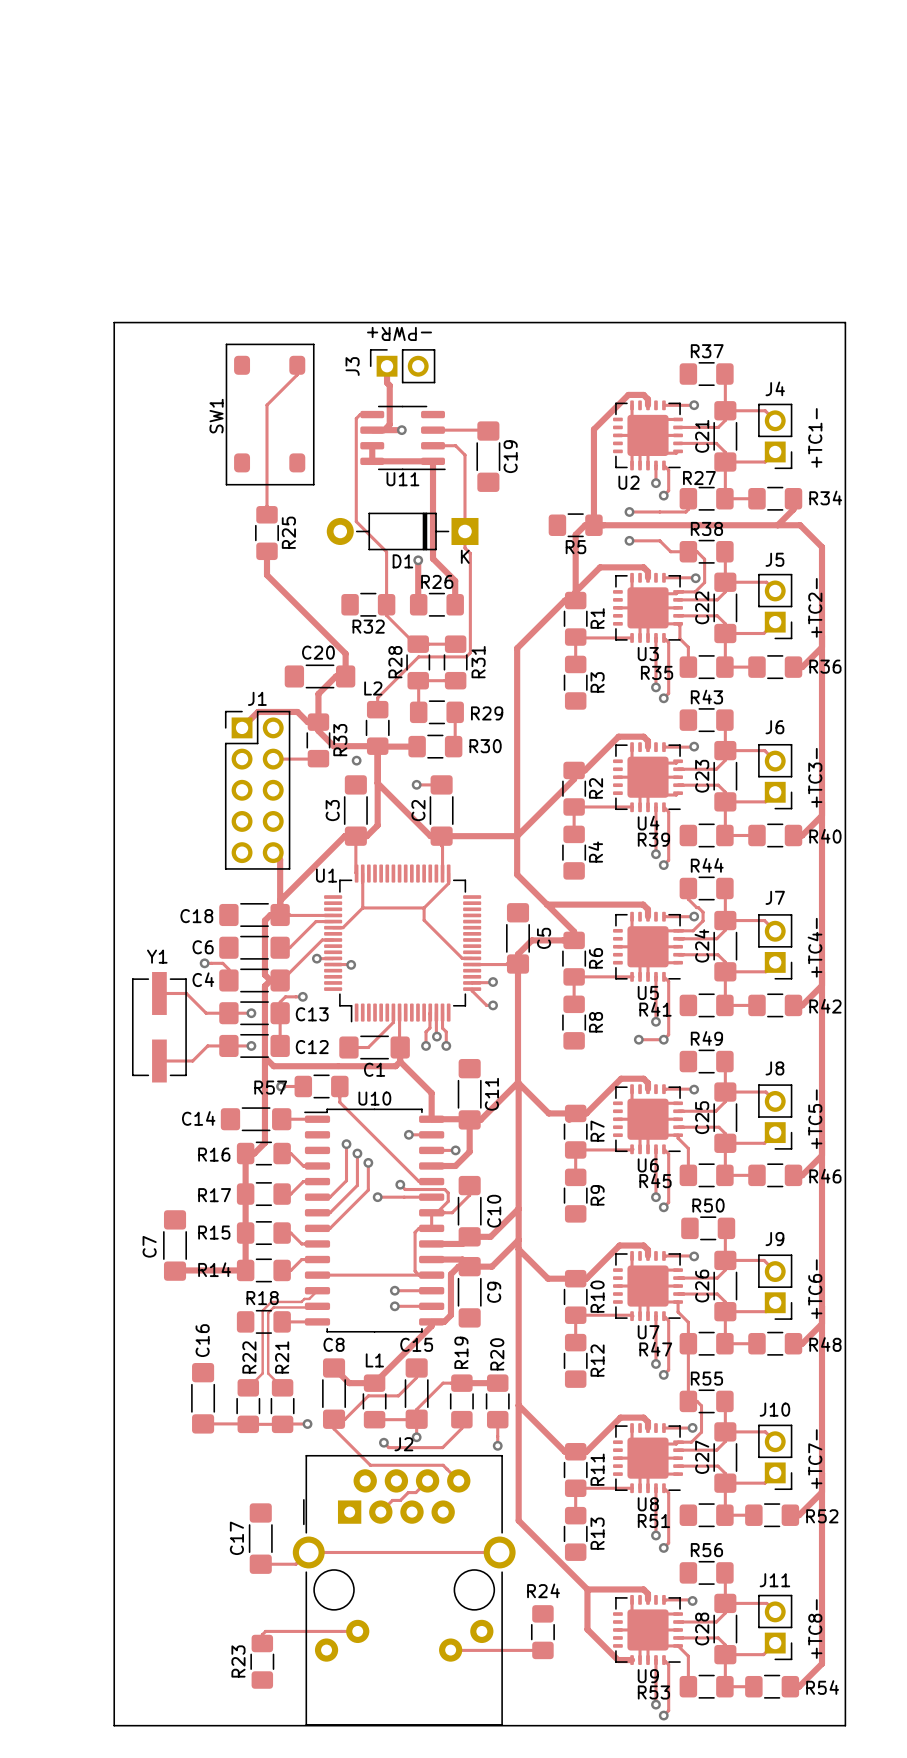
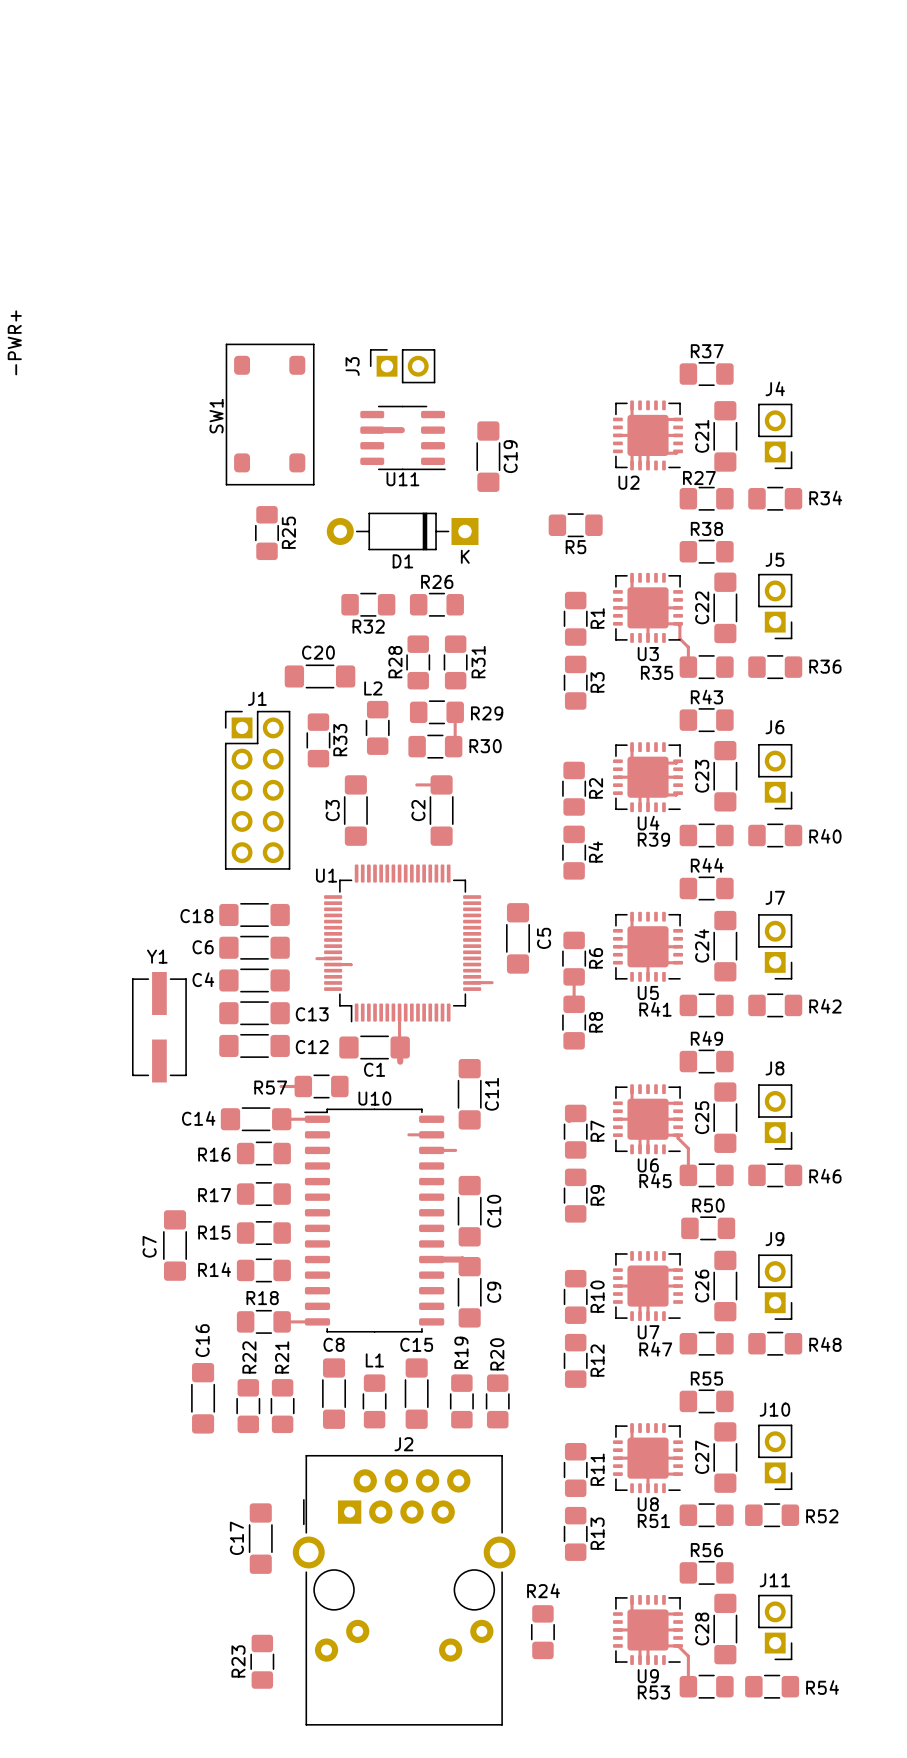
board edge: (114, 322) (114, 1725) (845, 1725) (845, 322) (114, 322) -> none
text: -PWR+ (399, 333) -> none
text: none -> -PWR+ (14, 342)
track: (297, 365) (297, 374) (267, 405) (267, 514) -> none
track: (387, 366) (387, 382) (389, 385) (389, 424) (384, 430) -> none
track: (724, 374) (725, 420) (718, 427) (679, 427) -> none
track: (648, 405) (648, 399) (643, 394) (628, 394) (593, 429) (593, 525) -> none
track: (663, 405) (694, 405) -> none
via: (694, 405) -> none
track: (725, 410) (765, 410) (775, 420) -> none
track: (372, 414) (360, 414) (356, 418) (356, 521) (386, 551) (386, 615) (415, 644) (455, 644) -> none
via: (401, 430) -> none
track: (433, 430) (488, 431) -> none
text: +TC1- (815, 437) -> none
track: (679, 443) (716, 443) (725, 452) (724, 498) (756, 498) -> none
track: (372, 445) (372, 461) (433, 461) (433, 558) (455, 580) (455, 604) -> none
track: (433, 445) (455, 445) (464, 455) (464, 548) (470, 553) (470, 652) (466, 656) (418, 656) (377, 697) (377, 709) -> none
track: (775, 451) (765, 462) (725, 462) -> none
track: (655, 465) (655, 483) -> none
track: (663, 465) (668, 470) (668, 490) (663, 495) -> none
via: (655, 483) -> none
via: (663, 495) -> none
track: (688, 498) (688, 509) (685, 511) (629, 511) -> none
track: (793, 498) (793, 509) (777, 525) -> none
via: (629, 511) -> none
track: (629, 540) (659, 540) (670, 551) (697, 551) (704, 559) (704, 582) (695, 591) (662, 593) (640, 615) (640, 637) -> none
via: (629, 540) -> none
track: (267, 551) (267, 575) (345, 653) (345, 676) (335, 676) (318, 693) (318, 730) (333, 746) (377, 746) -> none
track: (724, 551) (725, 591) (717, 599) (678, 599) -> none
track: (418, 560) (418, 604) -> none
via: (418, 560) -> none
track: (648, 577) (648, 571) (643, 567) (600, 567) (575, 591) -> none
track: (663, 577) (695, 578) -> none
via: (695, 578) -> none
track: (725, 582) (766, 582) (775, 590) -> none
text: +TC2- (815, 607) -> none
track: (678, 615) (717, 615) (725, 623) (724, 667) (756, 667) -> none
track: (775, 622) (763, 633) (725, 633) -> none
track: (632, 637) (575, 637) (575, 664) -> none
track: (655, 637) (655, 687) -> none
track: (663, 637) (668, 642) (668, 693) (663, 698) -> none
track: (822, 647) (802, 667) (793, 667) -> none
track: (455, 680) (418, 680) (418, 712) -> none
via: (655, 687) -> none
via: (663, 698) -> none
track: (724, 720) (725, 760) (716, 769) (678, 769) -> none
track: (318, 722) (307, 722) (297, 711) (258, 711) (242, 727) -> none
track: (377, 746) (417, 746) -> none
track: (377, 746) (377, 825) (366, 836) (344, 836) (280, 900) -> none
track: (694, 746) (663, 747) -> none
via: (694, 746) -> none
track: (648, 747) (648, 741) (643, 736) (618, 736) (584, 770) (574, 770) (574, 779) (517, 836) (430, 836) (377, 783) -> none
track: (725, 750) (764, 750) (775, 761) -> none
track: (318, 758) (273, 759) -> none
via: (356, 760) -> none
text: +TC3- (815, 777) -> none
via: (416, 784) -> none
track: (678, 785) (718, 785) (725, 792) (724, 835) (756, 835) -> none
track: (775, 792) (765, 801) (725, 801) -> none
track: (632, 807) (574, 806) (574, 834) -> none
track: (655, 807) (655, 854) -> none
track: (663, 807) (668, 812) (668, 860) (663, 865) -> none
track: (822, 815) (802, 835) (793, 835) -> none
track: (355, 836) (356, 873) -> none
track: (441, 836) (442, 873) -> none
track: (273, 852) (280, 859) (280, 914) -> none
via: (655, 854) -> none
via: (663, 865) -> none
track: (362, 873) (362, 907) -> none
track: (448, 873) (448, 883) (424, 907) -> none
track: (688, 888) (688, 899) (703, 912) (703, 920) (693, 930) (663, 930) (640, 954) (640, 976) -> none
track: (724, 888) (725, 930) (716, 938) (678, 938) -> none
track: (547, 904) (643, 904) (648, 909) (648, 916) -> none
track: (362, 907) (342, 927) (333, 927) -> none
track: (362, 907) (424, 907) -> none
track: (424, 907) (424, 920) (462, 958) (472, 958) -> none
track: (280, 914) (333, 915) -> none
track: (280, 914) (270, 914) (264, 920) (264, 974) (270, 980) -> none
track: (663, 916) (694, 916) -> none
via: (694, 916) -> none
track: (725, 920) (764, 920) (775, 931) -> none
track: (333, 921) (315, 921) (289, 947) (280, 947) -> none
track: (333, 939) (322, 939) (281, 980) -> none
text: +TC4- (815, 947) -> none
track: (678, 954) (717, 954) (725, 962) (724, 1005) (756, 1005) -> none
via: (316, 958) -> none
track: (775, 962) (765, 971) (725, 971) -> none
track: (204, 963) (222, 963) (228, 969) (228, 980) -> none
via: (204, 963) -> none
via: (351, 964) -> none
track: (518, 964) (472, 964) -> none
track: (574, 976) (632, 976) -> none
track: (655, 976) (655, 1021) -> none
track: (663, 976) (668, 981) (668, 1034) (663, 1039) (638, 1039) -> none
track: (270, 980) (264, 986) (264, 1142) (254, 1153) (245, 1153) (245, 1270) (175, 1271) -> none
via: (493, 982) -> none
track: (822, 985) (802, 1005) (793, 1005) -> none
track: (472, 989) (486, 1005) (493, 1005) -> none
track: (159, 993) (186, 993) (206, 1013) (251, 1013) -> none
track: (302, 996) (285, 996) (280, 1002) (280, 1045) -> none
via: (302, 996) -> none
via: (493, 1005) -> none
track: (393, 1012) (393, 1022) (368, 1047) (348, 1047) -> none
track: (430, 1012) (429, 1027) (426, 1031) (426, 1045) -> none
track: (436, 1012) (436, 1036) -> none
track: (442, 1012) (442, 1028) (446, 1031) (446, 1045) -> none
via: (251, 1013) -> none
via: (655, 1021) -> none
via: (436, 1036) -> none
via: (638, 1039) -> none
via: (663, 1039) -> none
track: (251, 1045) (207, 1045) (192, 1061) (159, 1061) -> none
via: (251, 1045) -> none
via: (426, 1045) -> none
via: (446, 1045) -> none
track: (264, 1057) (273, 1066) (337, 1066) -> none
track: (724, 1061) (725, 1101) (715, 1111) (678, 1111) -> none
track: (338, 1066) (395, 1066) (400, 1061) (431, 1093) (431, 1119) (469, 1119) -> none
track: (518, 1082) (518, 954) (531, 940) (574, 940) (574, 931) (517, 874) (517, 648) (564, 600) (575, 600) (575, 534) (585, 525) (800, 525) (822, 547) (822, 1663) (799, 1686) (790, 1686) -> none
track: (518, 1082) (480, 1119) (469, 1119) -> none
track: (518, 1082) (548, 1113) (586, 1113) (621, 1078) (643, 1078) (648, 1083) (648, 1089) -> none
track: (518, 1083) (518, 1520) (587, 1589) -> none
via: (281, 1086) -> none
track: (339, 1086) (339, 1102) (419, 1181) (431, 1181) -> none
track: (663, 1089) (694, 1089) -> none
via: (694, 1089) -> none
track: (725, 1092) (765, 1092) (775, 1101) -> none
track: (469, 1119) (469, 1151) (455, 1166) (431, 1166) -> none
text: +TC5- (815, 1119) -> none
track: (678, 1127) (718, 1127) (725, 1133) (724, 1175) (756, 1175) -> none
track: (775, 1132) (764, 1143) (725, 1143) -> none
via: (408, 1134) -> none
track: (346, 1144) (346, 1180) (330, 1197) (317, 1197) -> none
via: (346, 1144) -> none
track: (632, 1149) (575, 1149) (575, 1177) -> none
track: (655, 1149) (655, 1197) -> none
track: (663, 1149) (668, 1154) (668, 1202) (663, 1207) -> none
via: (455, 1150) -> none
track: (282, 1153) (290, 1153) (303, 1166) (317, 1166) -> none
track: (357, 1153) (357, 1185) (330, 1212) (317, 1212) -> none
via: (357, 1153) -> none
track: (822, 1155) (802, 1175) (793, 1175) -> none
track: (368, 1162) (368, 1190) (330, 1228) (317, 1228) -> none
via: (368, 1162) -> none
track: (317, 1181) (303, 1181) (290, 1194) (282, 1194) -> none
track: (400, 1184) (405, 1189) (444, 1189) (448, 1192) (448, 1201) (436, 1212) -> none
via: (400, 1184) -> none
track: (469, 1185) (469, 1195) (452, 1212) (431, 1212) (431, 1228) (419, 1228) (415, 1232) (415, 1271) (419, 1275) -> none
track: (377, 1197) (431, 1197) -> none
via: (377, 1197) -> none
via: (655, 1197) -> none
via: (663, 1207) -> none
track: (518, 1208) (490, 1236) (469, 1236) (462, 1243) (431, 1243) -> none
track: (726, 1228) (725, 1270) (717, 1278) (678, 1278) -> none
track: (282, 1233) (290, 1233) (301, 1243) (317, 1243) -> none
track: (518, 1239) (491, 1266) (458, 1266) (450, 1274) (450, 1315) (444, 1321) (431, 1321) (431, 1326) (374, 1383) (349, 1383) (334, 1367) -> none
track: (518, 1249) (548, 1278) (586, 1278) (619, 1245) (643, 1245) (648, 1249) (648, 1255) -> none
track: (632, 1255) (632, 1270) (663, 1302) (678, 1302) (678, 1312) (688, 1322) (688, 1401) (697, 1401) (701, 1405) (701, 1432) (691, 1442) (662, 1444) (640, 1466) (640, 1488) -> none
track: (663, 1255) (694, 1256) -> none
via: (694, 1256) -> none
track: (317, 1259) (301, 1259) (290, 1270) (282, 1270) -> none
track: (725, 1260) (764, 1260) (775, 1271) -> none
track: (317, 1275) (431, 1275) -> none
text: +TC6- (815, 1289) -> none
track: (317, 1290) (309, 1298) (304, 1298) (301, 1301) (271, 1301) (262, 1310) (262, 1373) (248, 1387) -> none
via: (394, 1290) -> none
track: (395, 1290) (431, 1290) -> none
track: (678, 1294) (717, 1294) (725, 1302) (724, 1343) (756, 1343) -> none
track: (775, 1302) (766, 1311) (725, 1311) -> none
track: (317, 1306) (273, 1307) (268, 1312) (268, 1373) (282, 1387) -> none
via: (394, 1306) -> none
track: (395, 1306) (431, 1306) -> none
track: (632, 1316) (575, 1315) (575, 1342) -> none
track: (655, 1316) (655, 1363) -> none
track: (663, 1316) (668, 1320) (668, 1369) (663, 1374) -> none
track: (822, 1323) (802, 1343) (793, 1343) -> none
via: (655, 1363) -> none
track: (416, 1367) (416, 1377) (398, 1395) (368, 1395) (345, 1419) (334, 1419) (334, 1428) (370, 1465) (443, 1465) (458, 1480) -> none
via: (663, 1374) -> none
track: (497, 1383) (443, 1383) (416, 1409) (416, 1437) -> none
track: (724, 1401) (725, 1441) (716, 1450) (678, 1450) -> none
track: (518, 1405) (564, 1451) (586, 1451) (620, 1417) (643, 1417) (648, 1422) (648, 1428) -> none
track: (416, 1419) (374, 1419) -> none
track: (461, 1419) (461, 1428) (442, 1447) (388, 1447) (383, 1442) -> none
track: (497, 1419) (497, 1445) -> none
track: (203, 1423) (307, 1424) -> none
via: (307, 1424) -> none
via: (692, 1427) -> none
track: (663, 1428) (692, 1428) -> none
track: (725, 1431) (765, 1431) (775, 1441) -> none
via: (416, 1437) -> none
via: (383, 1442) -> none
via: (497, 1445) -> none
text: +TC7- (815, 1459) -> none
track: (678, 1466) (717, 1466) (725, 1473) (724, 1515) (753, 1515) -> none
track: (775, 1472) (764, 1483) (725, 1483) -> none
track: (427, 1480) (415, 1492) (408, 1492) (400, 1500) (392, 1500) (380, 1512) -> none
track: (631, 1488) (575, 1488) (575, 1515) -> none
track: (655, 1488) (655, 1535) -> none
track: (663, 1488) (668, 1492) (668, 1543) (663, 1547) -> none
track: (822, 1492) (799, 1515) (790, 1515) -> none
via: (655, 1535) -> none
via: (663, 1547) -> none
track: (499, 1552) (307, 1552) (295, 1564) (260, 1564) -> none
track: (724, 1572) (725, 1613) (716, 1622) (678, 1622) -> none
track: (587, 1589) (643, 1589) (648, 1593) (648, 1599) -> none
track: (587, 1589) (587, 1629) (618, 1660) (632, 1660) -> none
track: (665, 1600) (692, 1600) -> none
via: (692, 1600) -> none
track: (725, 1603) (766, 1603) (775, 1611) -> none
text: +TC8- (815, 1629) -> none
track: (357, 1631) (265, 1631) (262, 1634) (262, 1643) -> none
track: (678, 1637) (718, 1637) (725, 1644) (724, 1686) (753, 1686) -> none
track: (775, 1643) (763, 1654) (725, 1654) -> none
track: (450, 1650) (542, 1650) -> none
track: (655, 1660) (655, 1704) -> none
track: (663, 1660) (668, 1664) (668, 1710) (663, 1715) -> none
via: (655, 1704) -> none
via: (663, 1715) -> none

